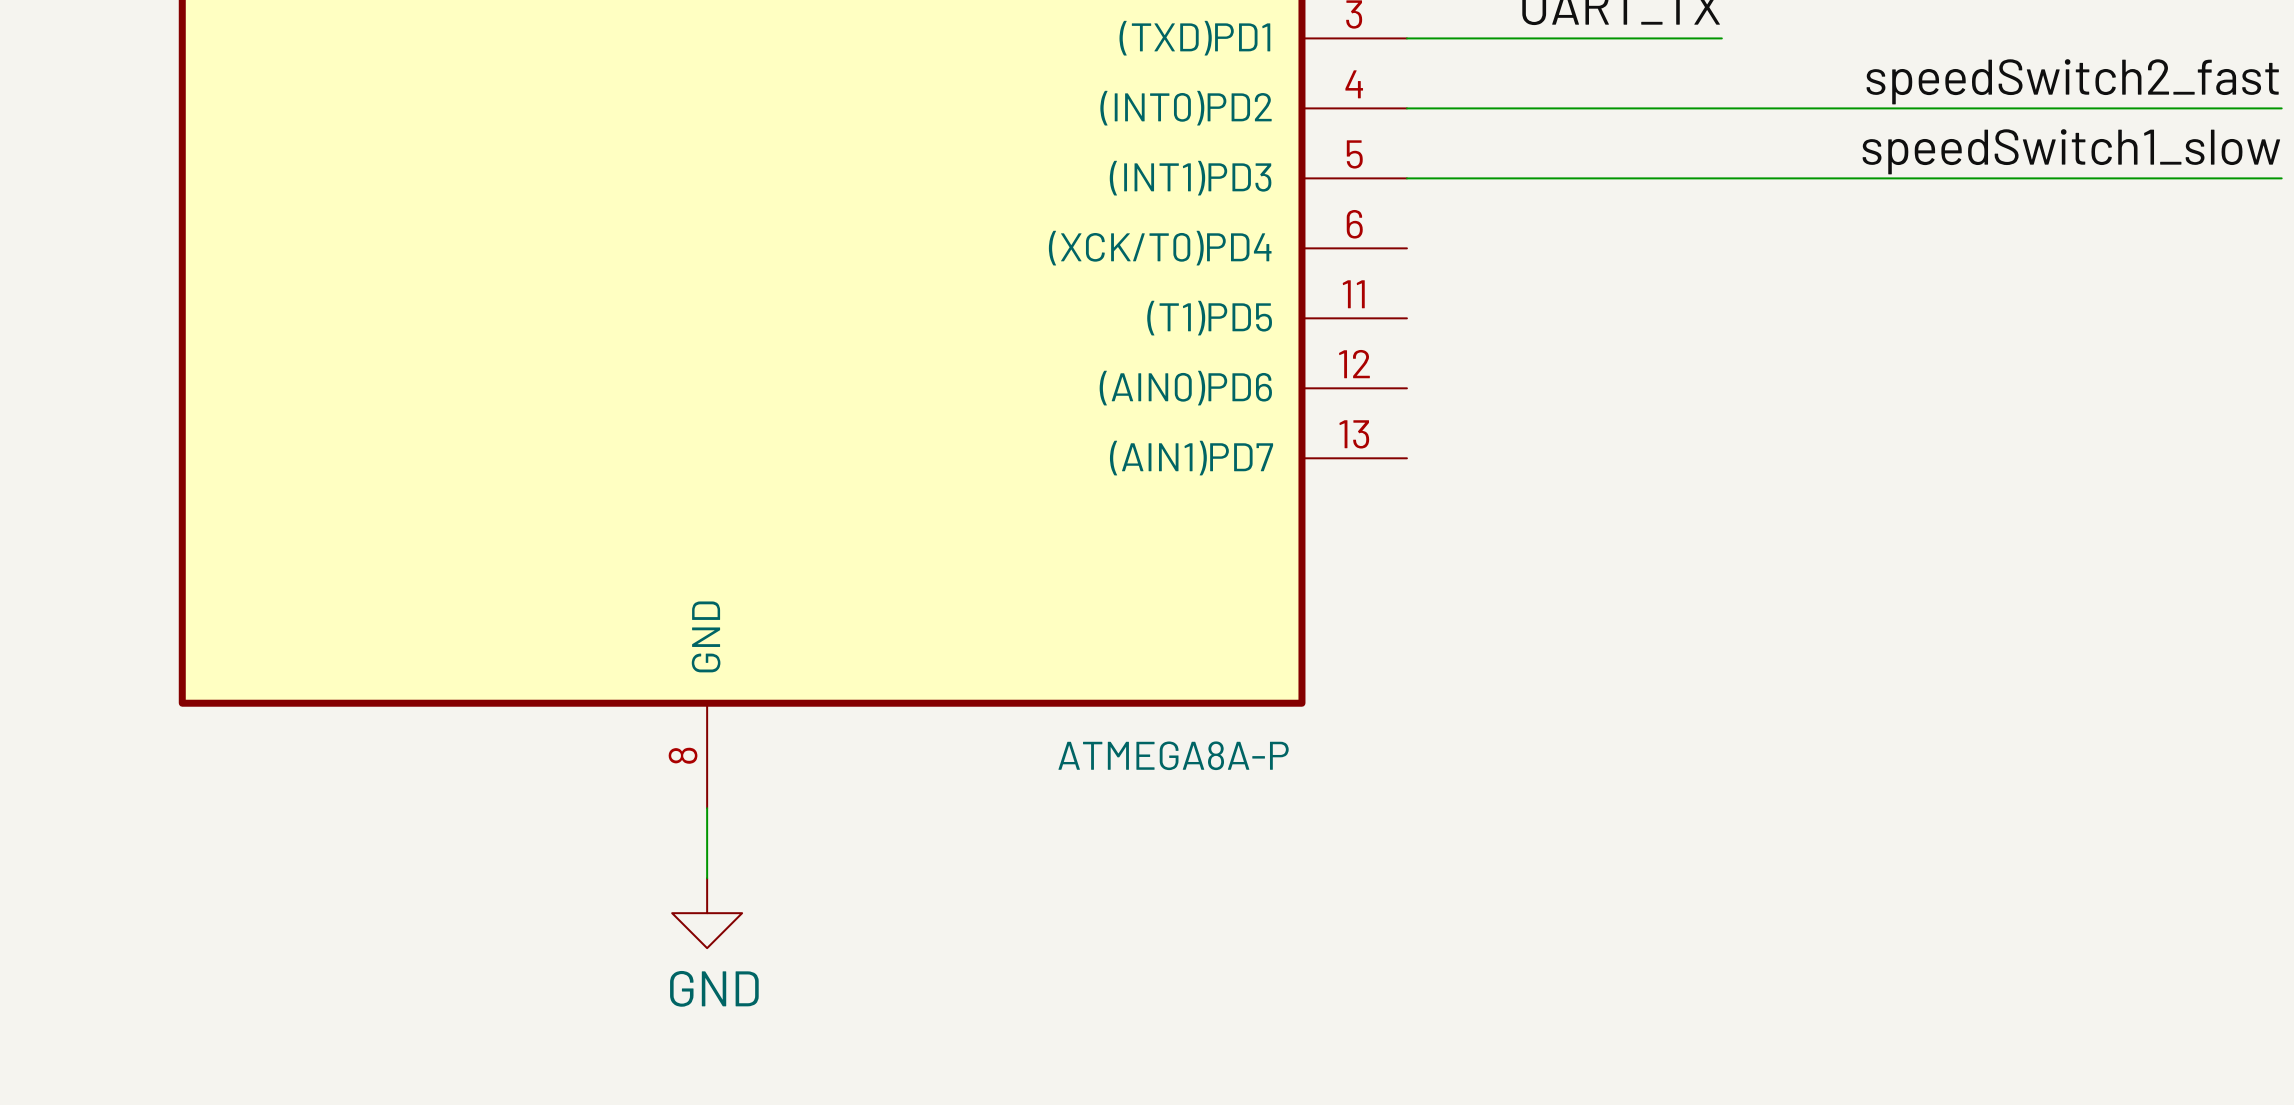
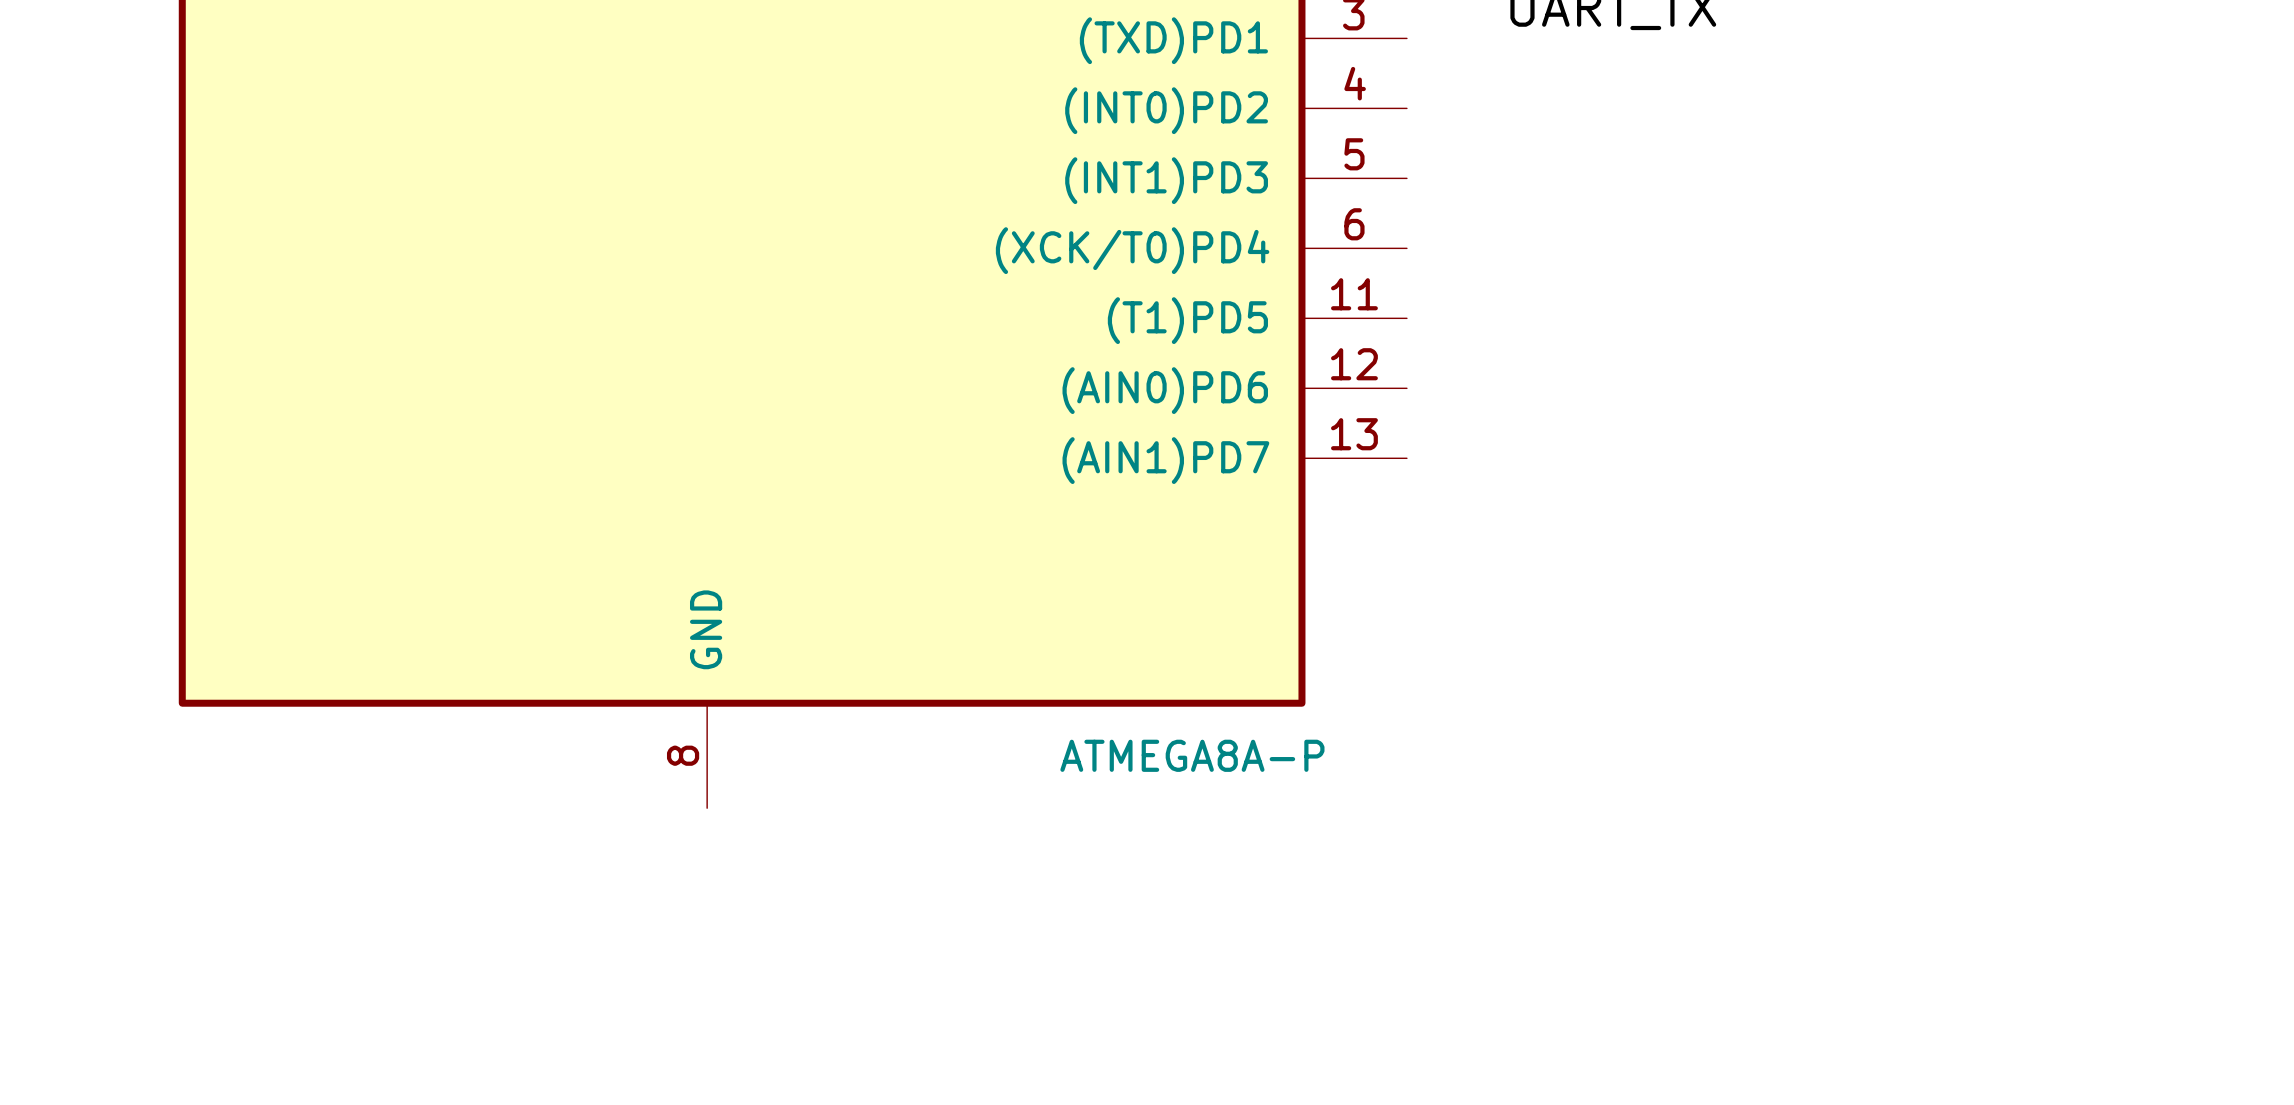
wire: (1406, 38) (1721, 38) -> none
label: speedSwitch2_fast (2072, 81) -> none
wire: (1406, 108) (2281, 108) -> none
label: speedSwitch1_slow (2071, 151) -> none
wire: (1406, 178) (2281, 178) -> none
wire: (707, 808) (707, 878) -> none
power symbol: GND (707, 913) -> none

